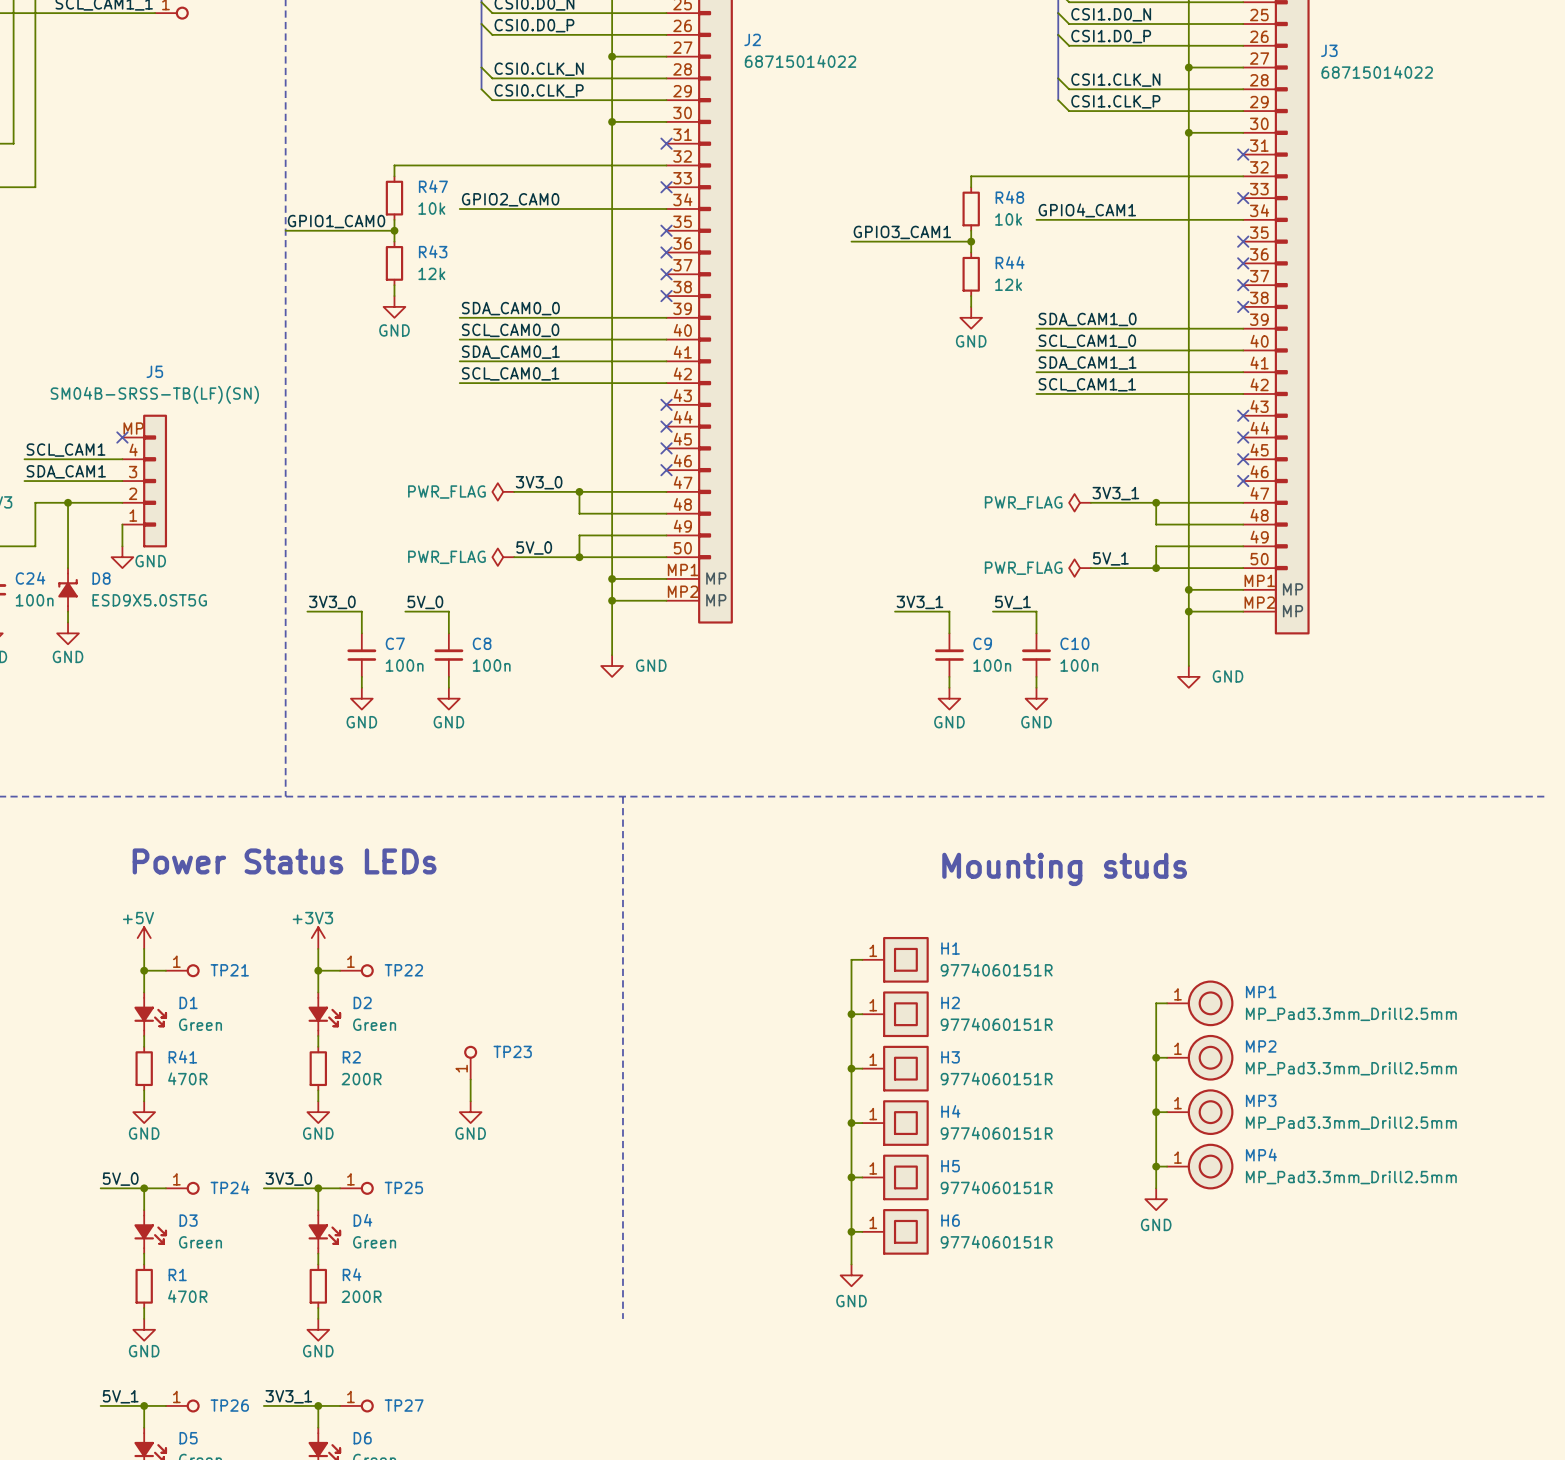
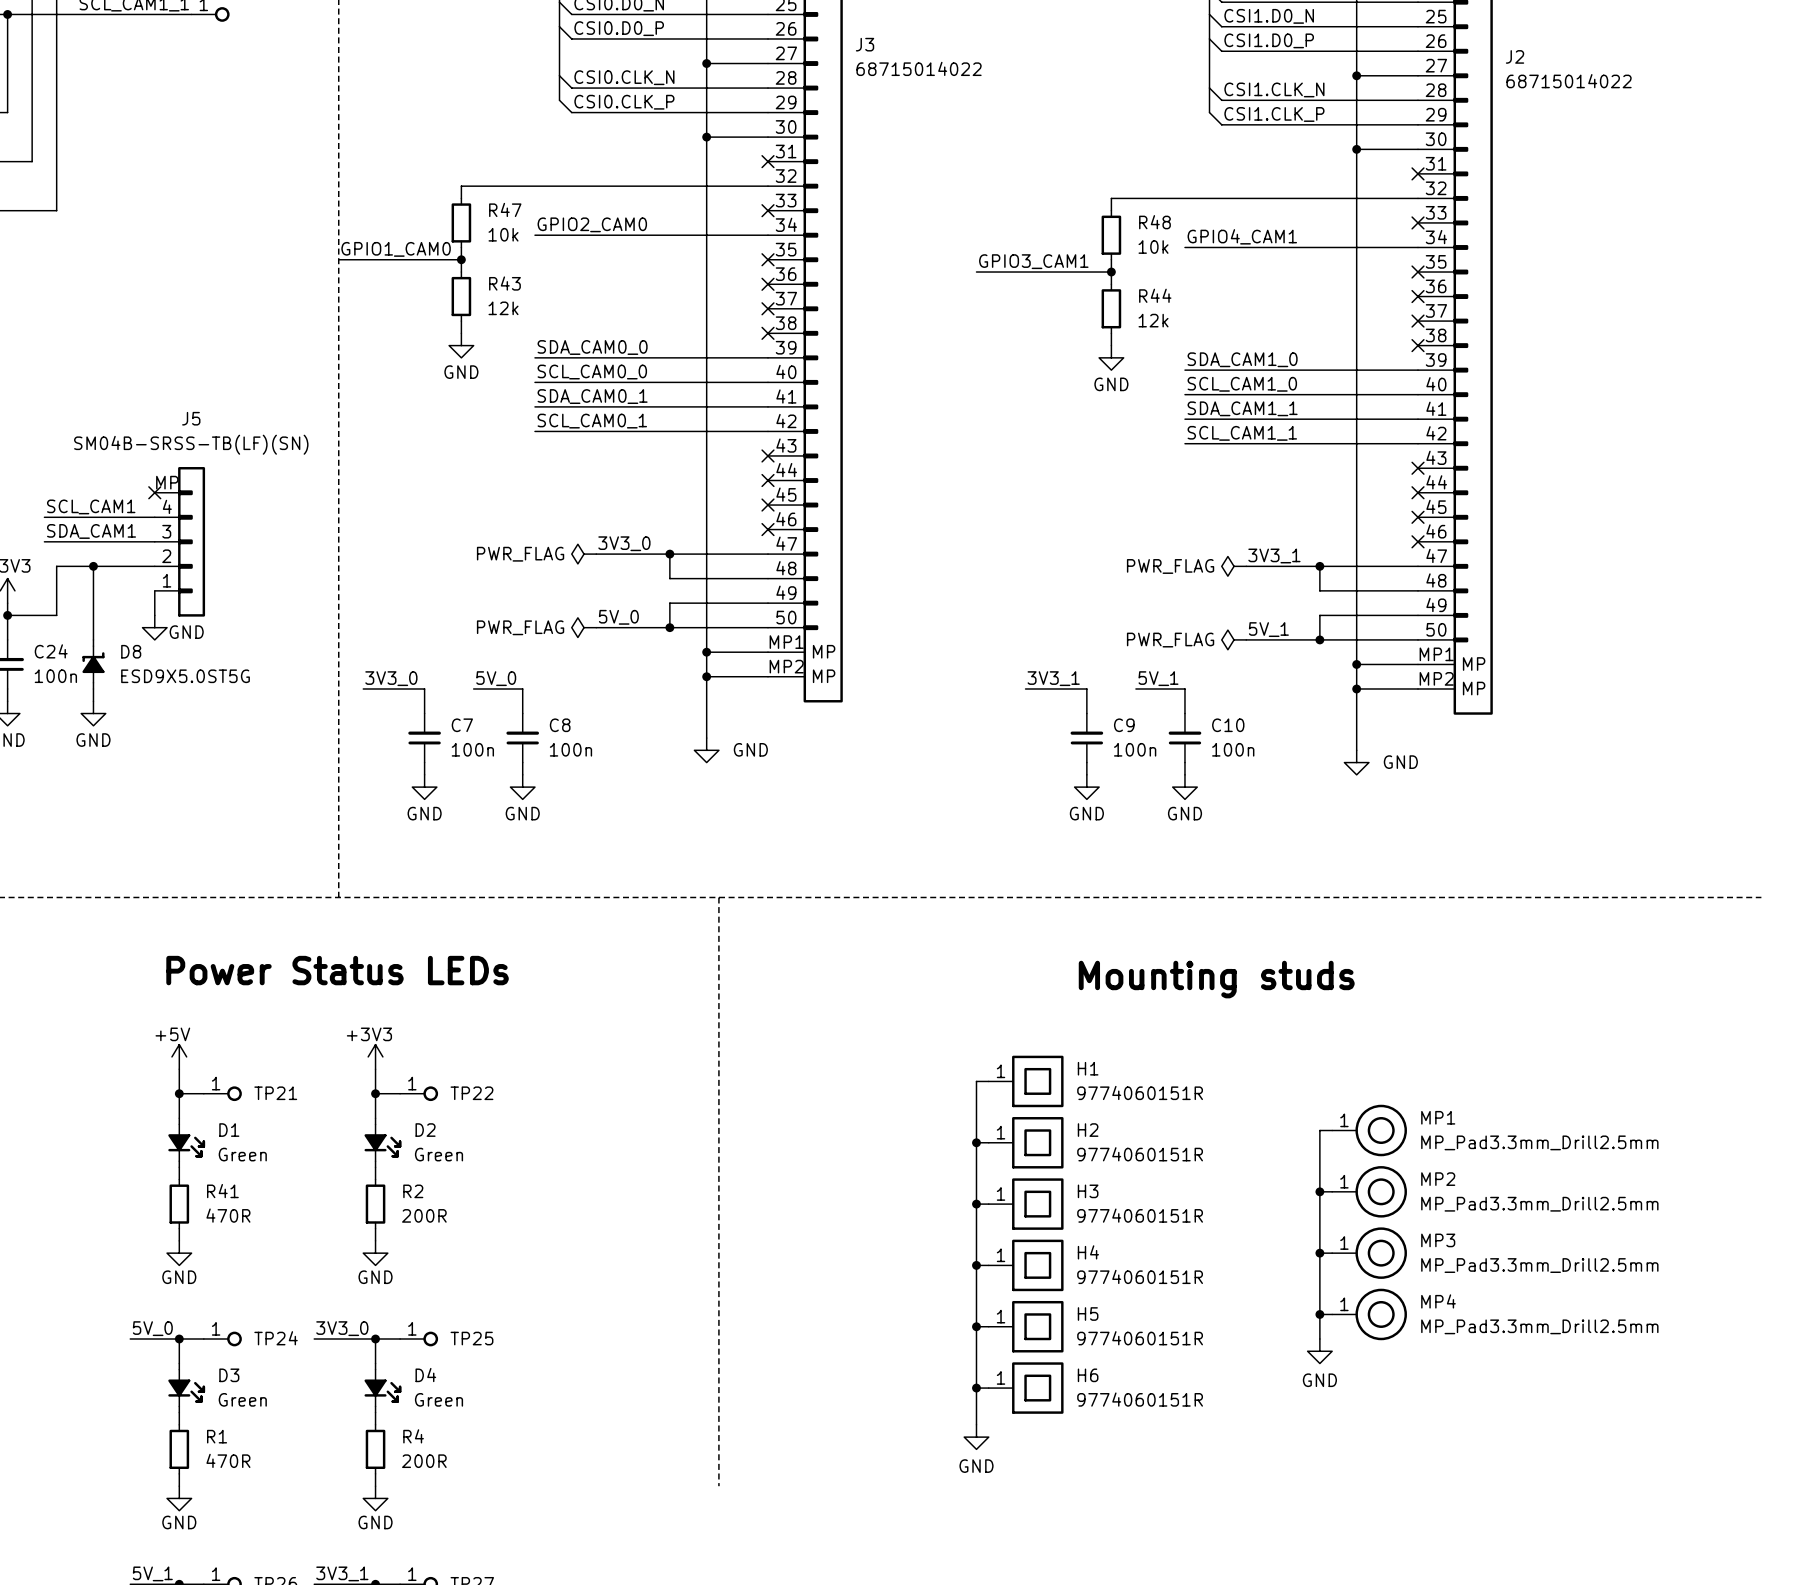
J2 name: J2 (752, 39) -> J3 (865, 44)
J3 name: J3 (1329, 50) -> J2 (1515, 56)
TP23: (470, 1062) -> none
wire: (470, 1079) (470, 1101) -> none
power symbol: GND (470, 1112) -> none

